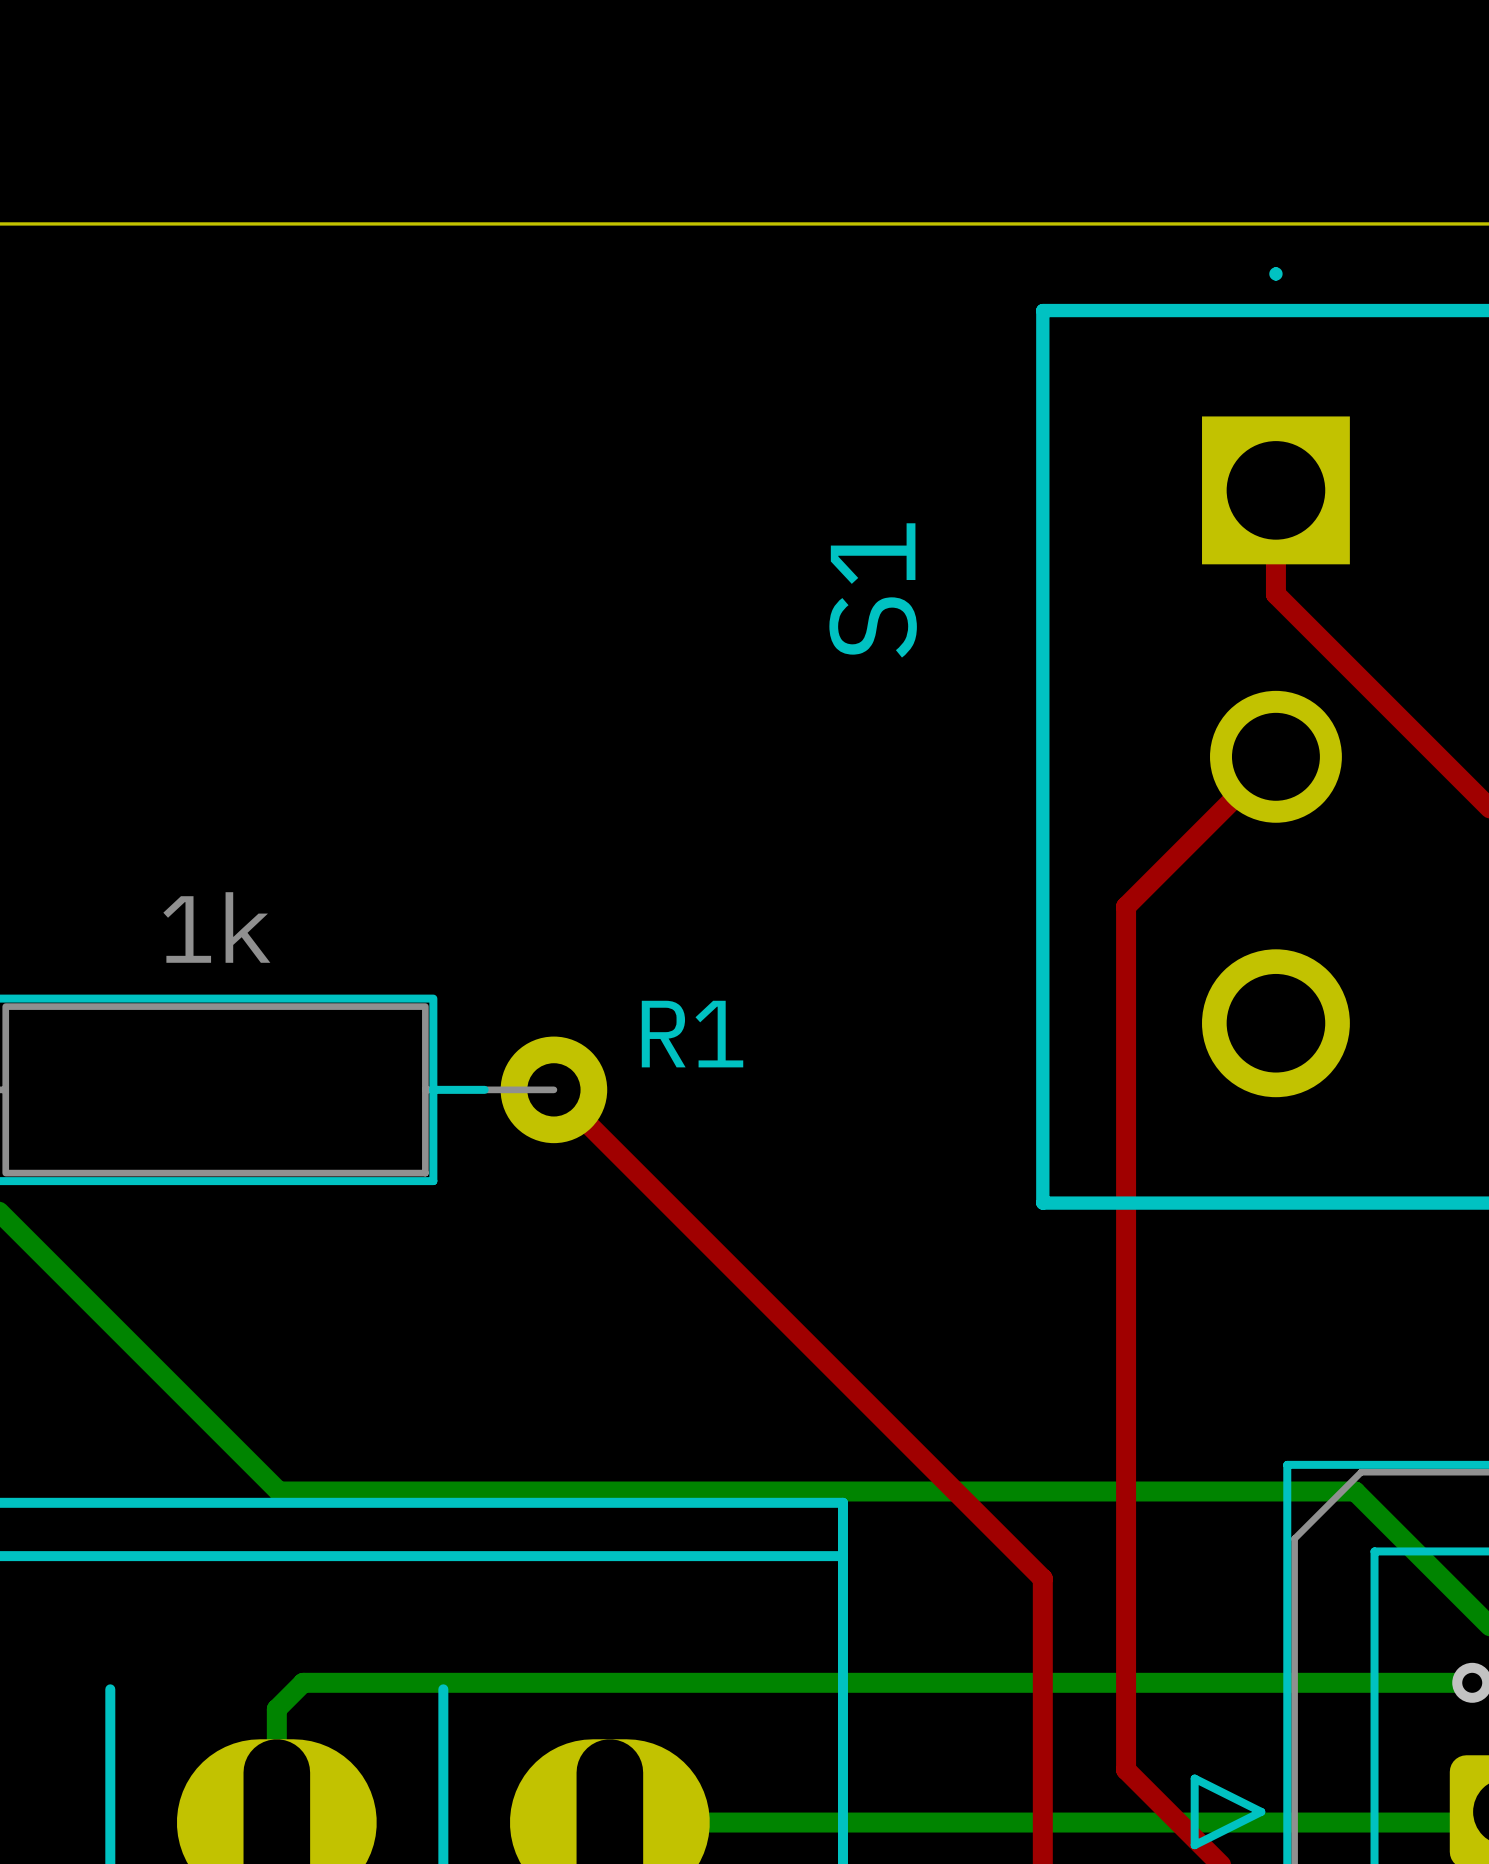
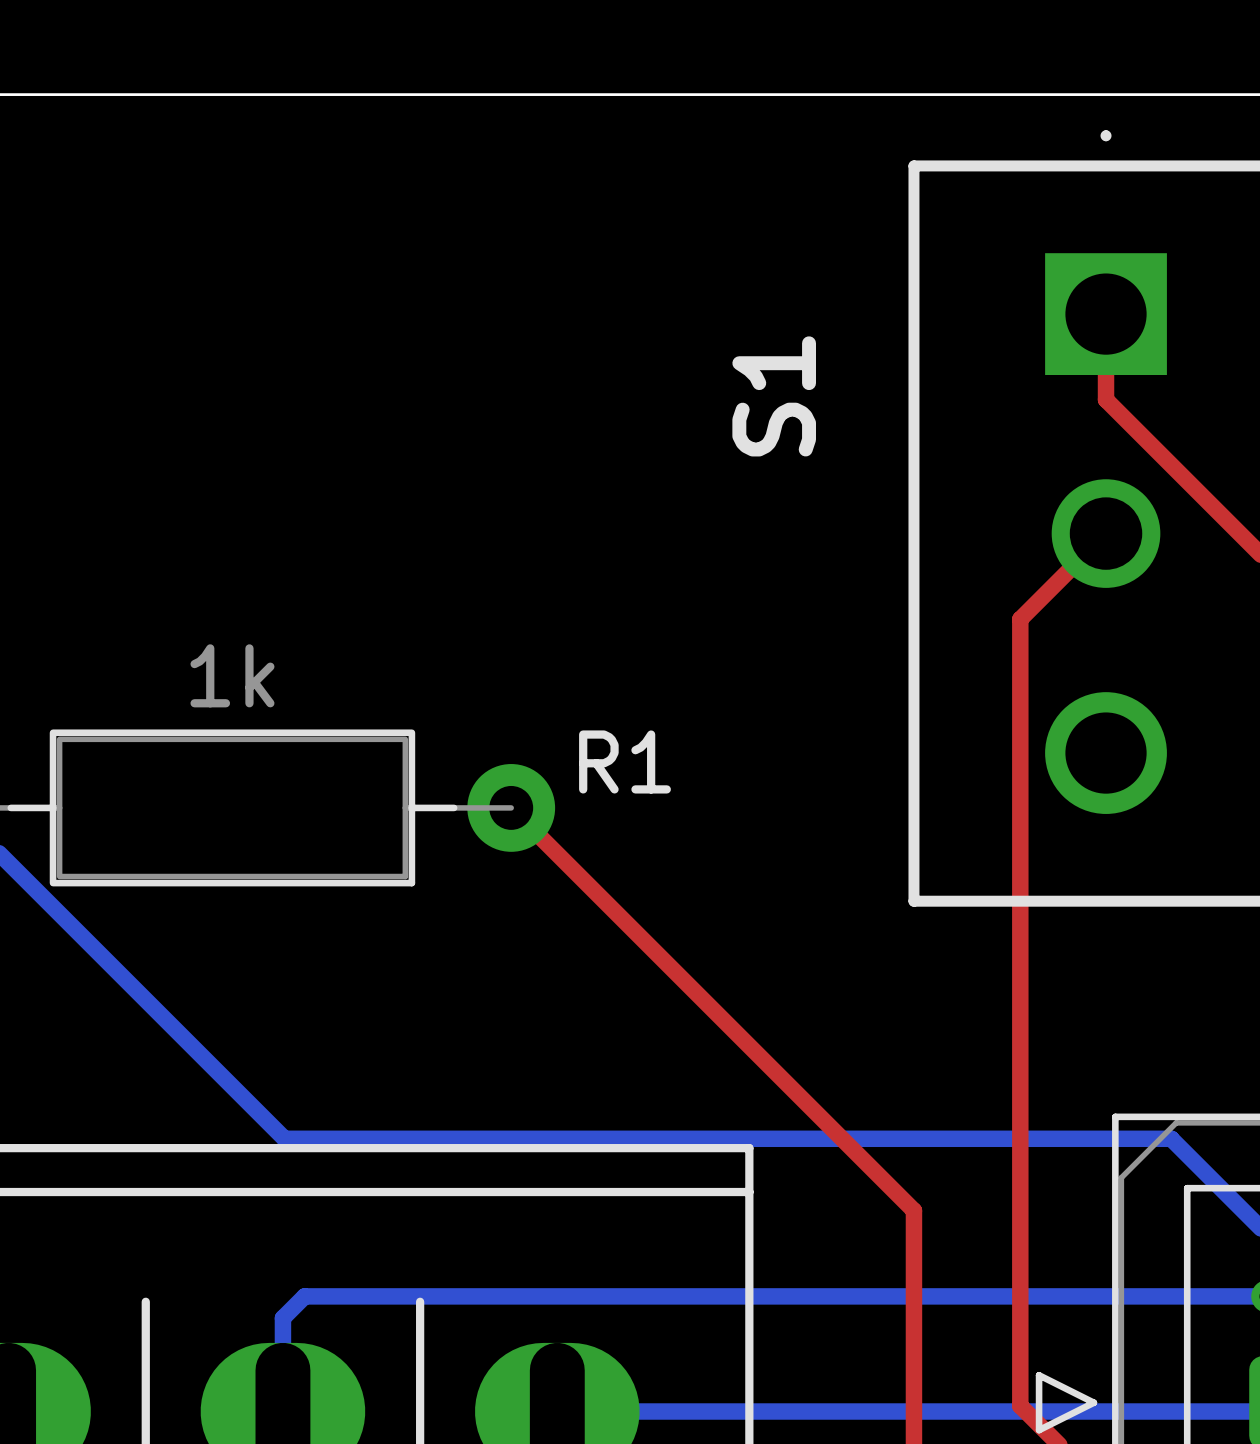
top track: (1171, 860) (1126, 906) (1126, 1769) (1171, 1815) -> (1020, 619) (1020, 1405)

